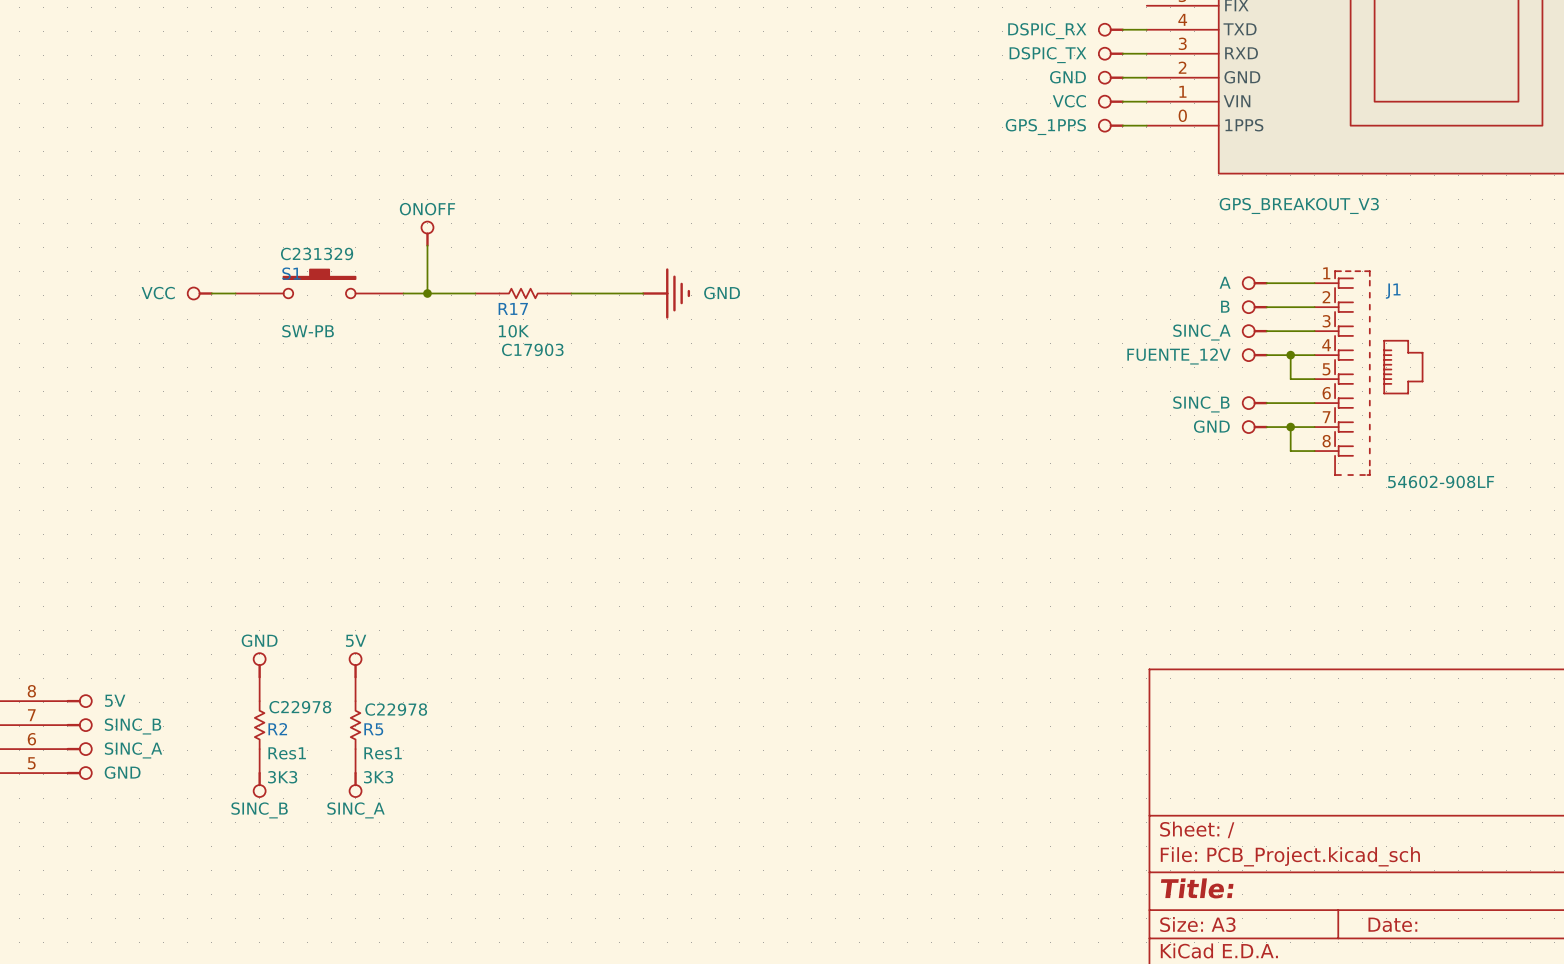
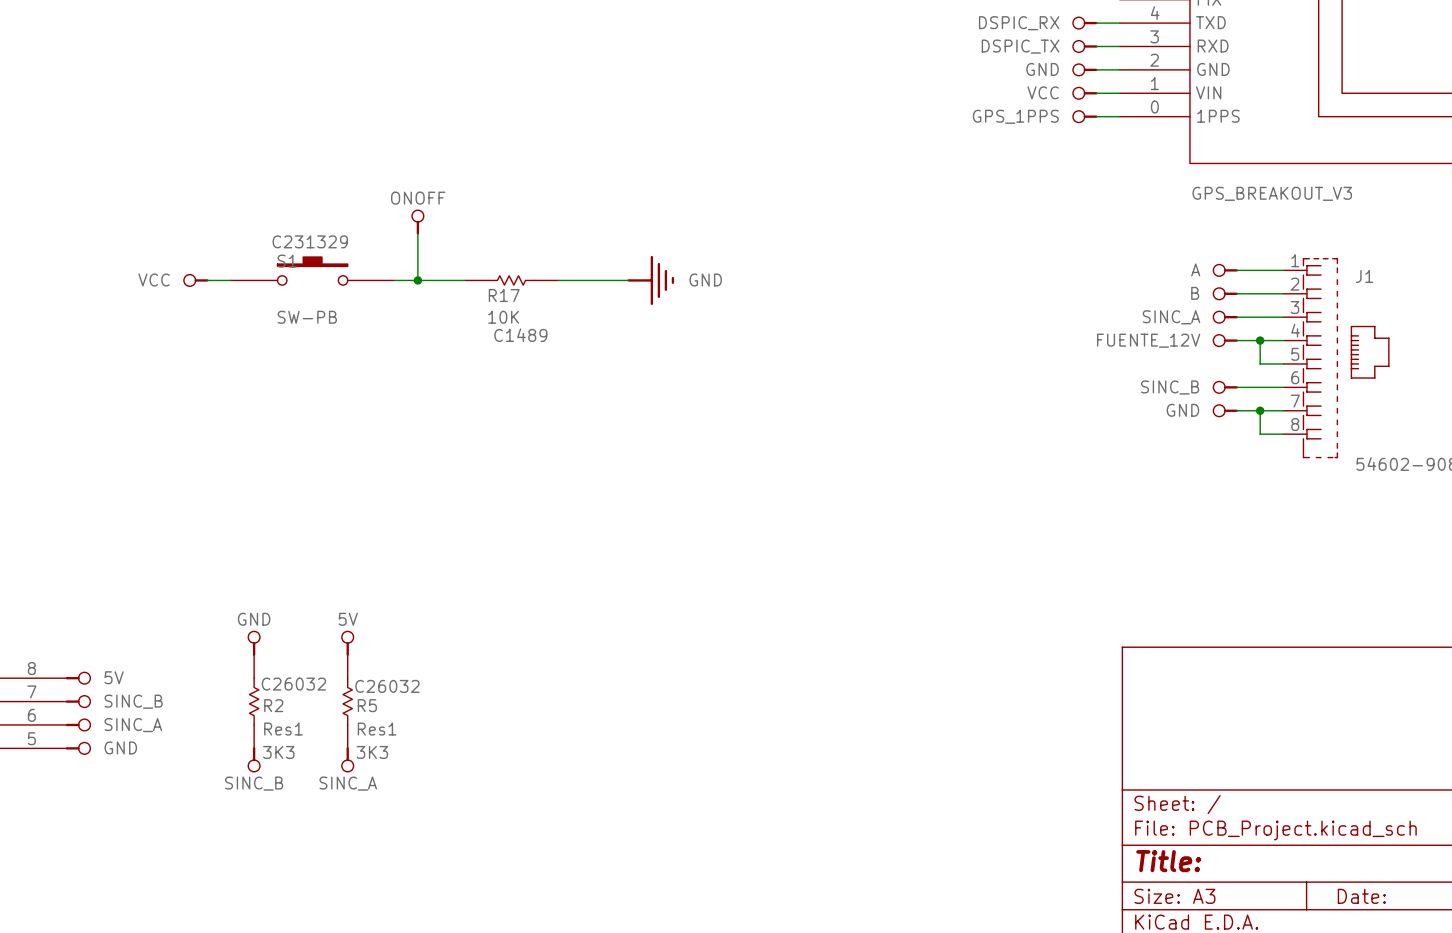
R17 text: C17903 (532, 349) -> C1489 (520, 335)
R2 text: C22978 (300, 707) -> C26032 (293, 684)
R5 text: C22978 (396, 709) -> C26032 (387, 686)

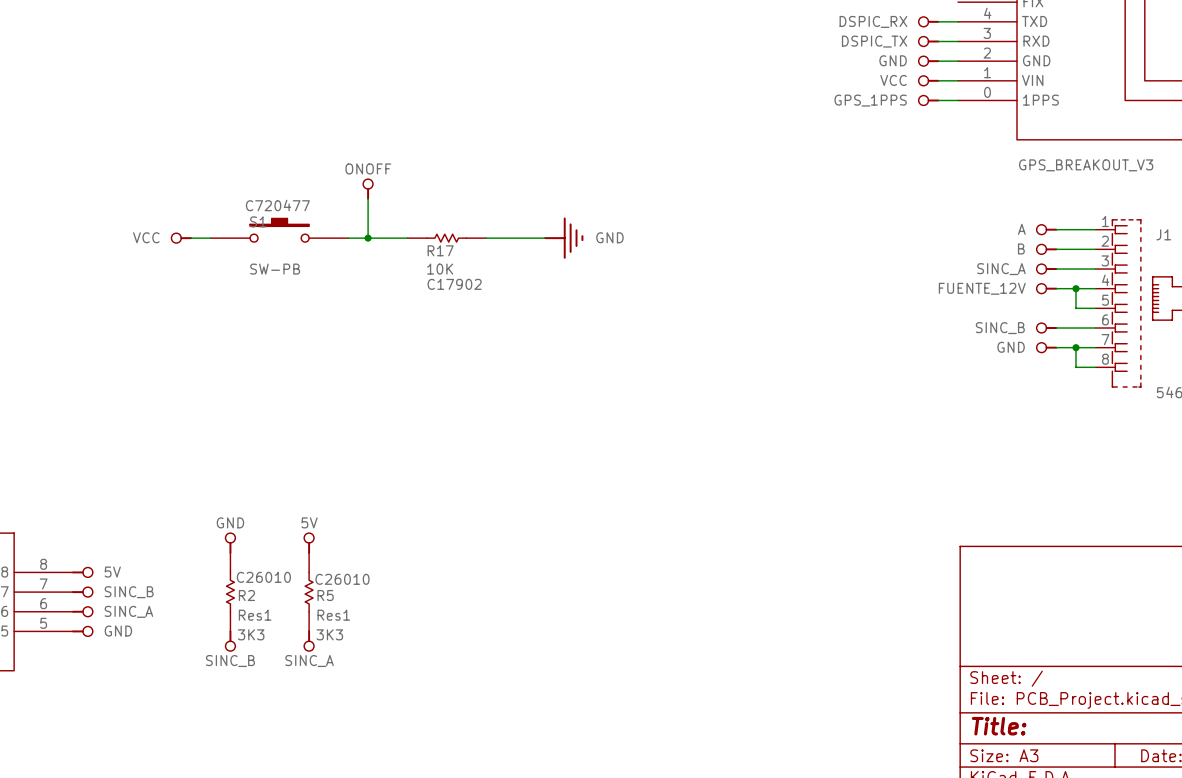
S1 text: C231329 (310, 241) -> C720477 (277, 205)
R17 text: C1489 (520, 335) -> C17902 (454, 284)
R2 text: C26032 (293, 684) -> C26010 (263, 577)
R5 text: C26032 (387, 686) -> C26010 (342, 579)

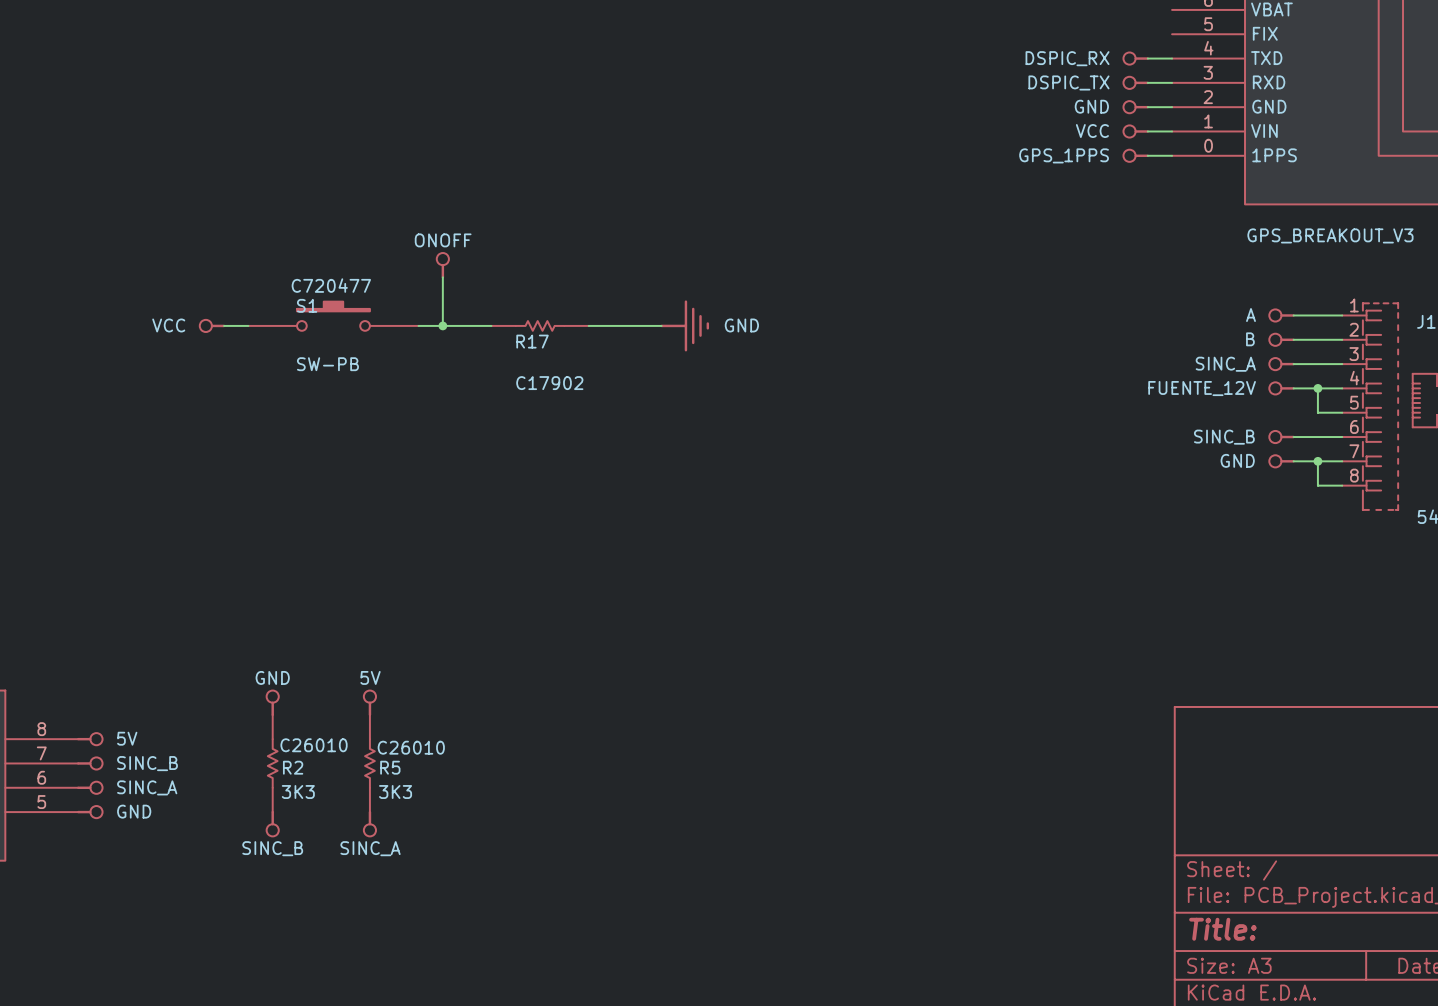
R17 text: 10K (440, 269) -> none
R2 value: Res1 (255, 615) -> 3K3 (298, 792)
R5 value: Res1 (333, 615) -> 3K3 (395, 792)
R2 text: 3K3 (251, 634) -> none
R5 text: 3K3 (329, 634) -> none

